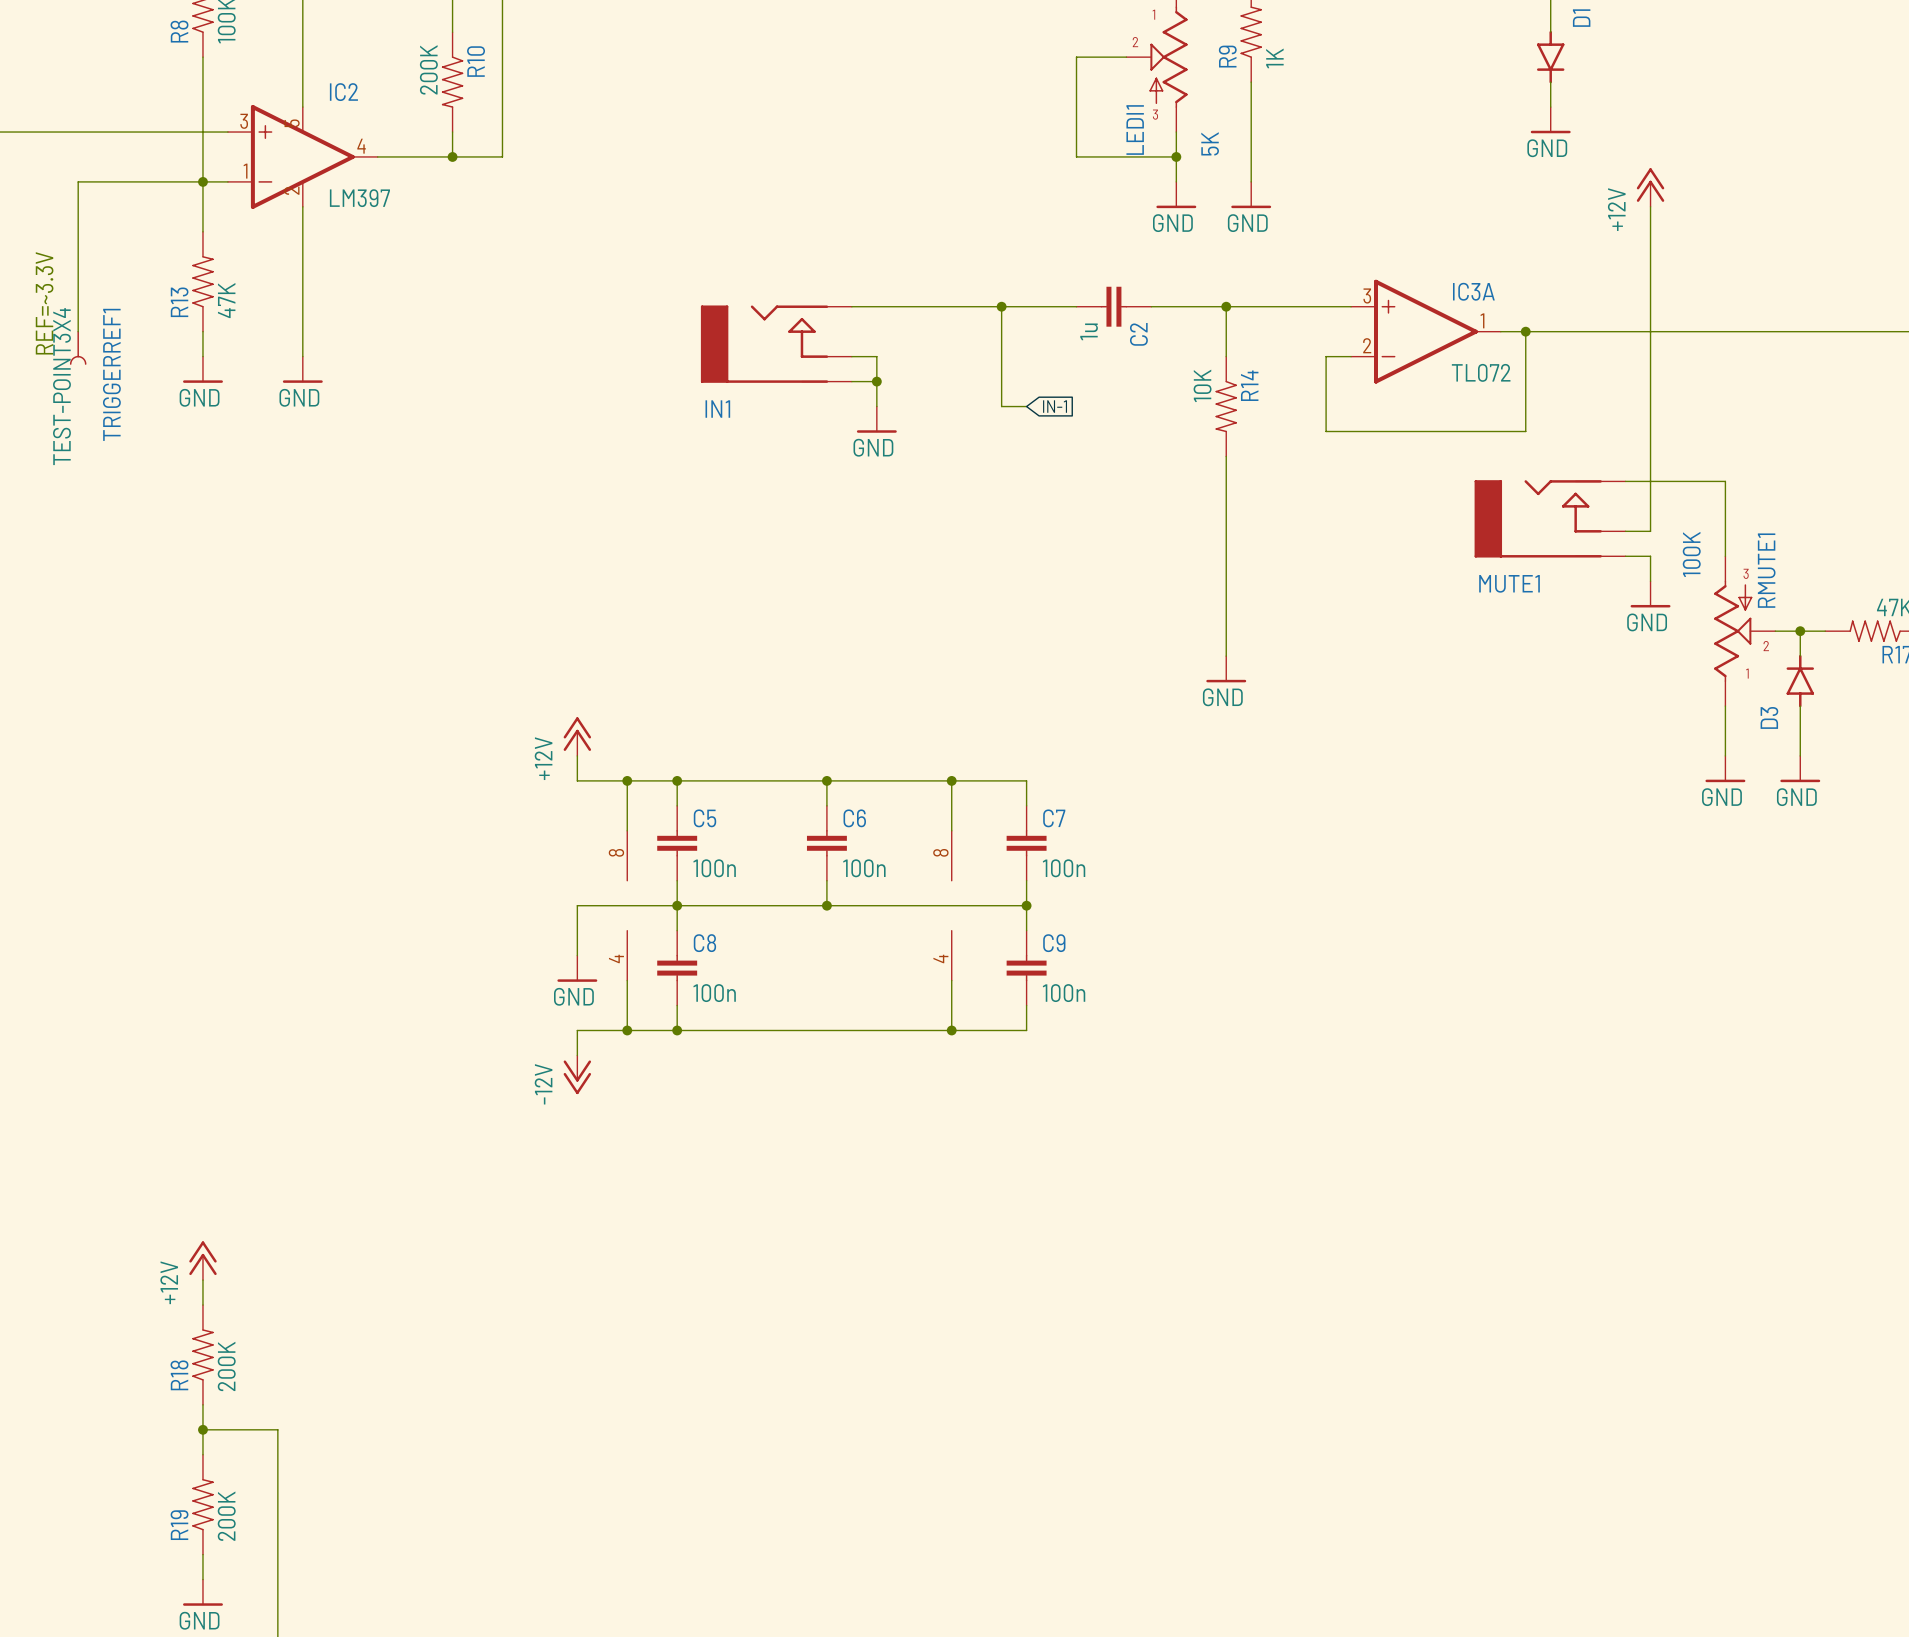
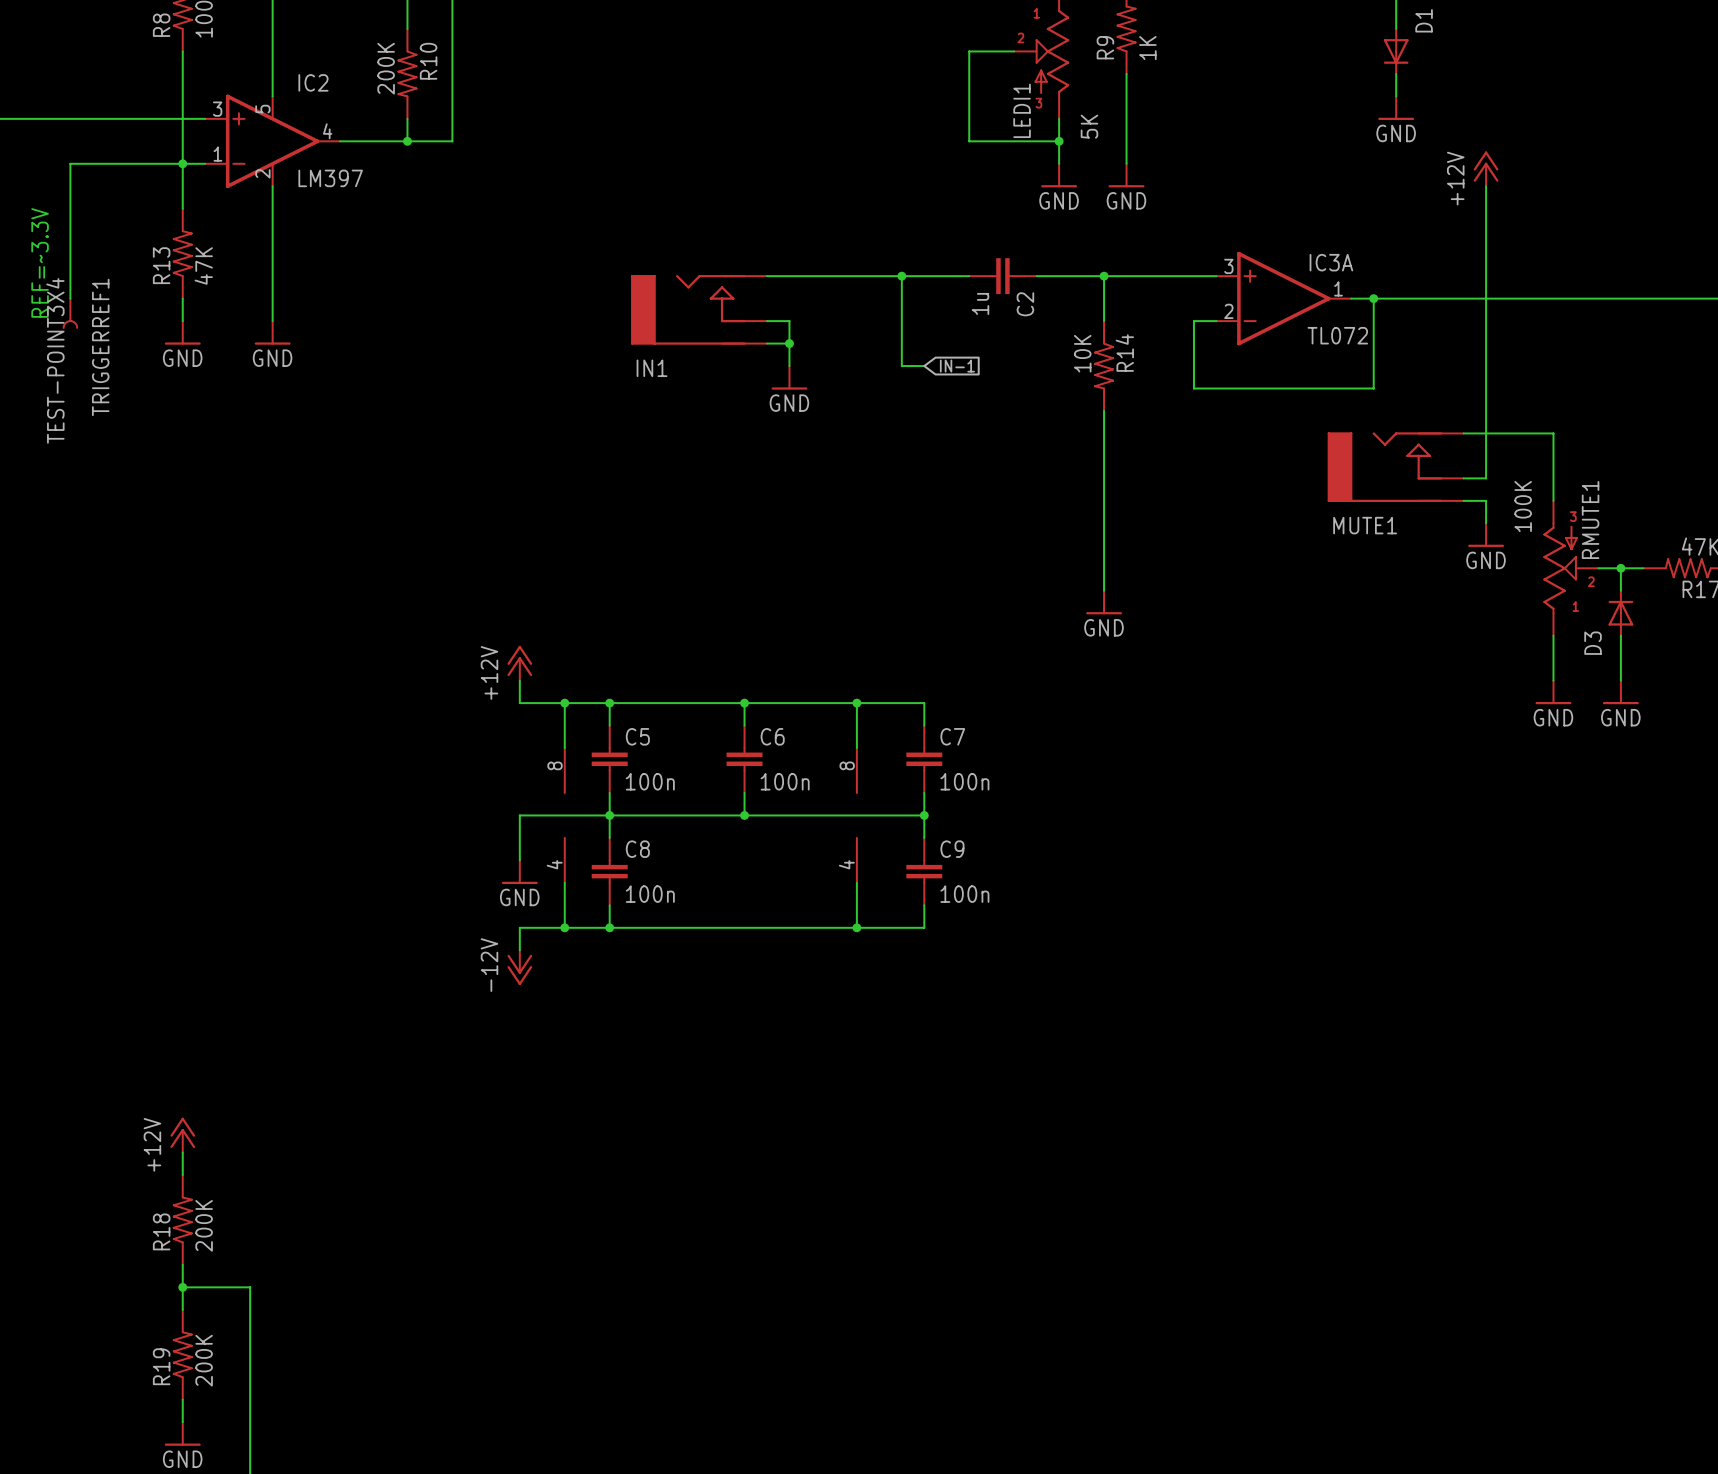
D1 symbol: [1536, 30, 1565, 84] -> [1383, 28, 1409, 74]
D3 symbol: [1786, 654, 1815, 708] -> [1608, 590, 1634, 636]

